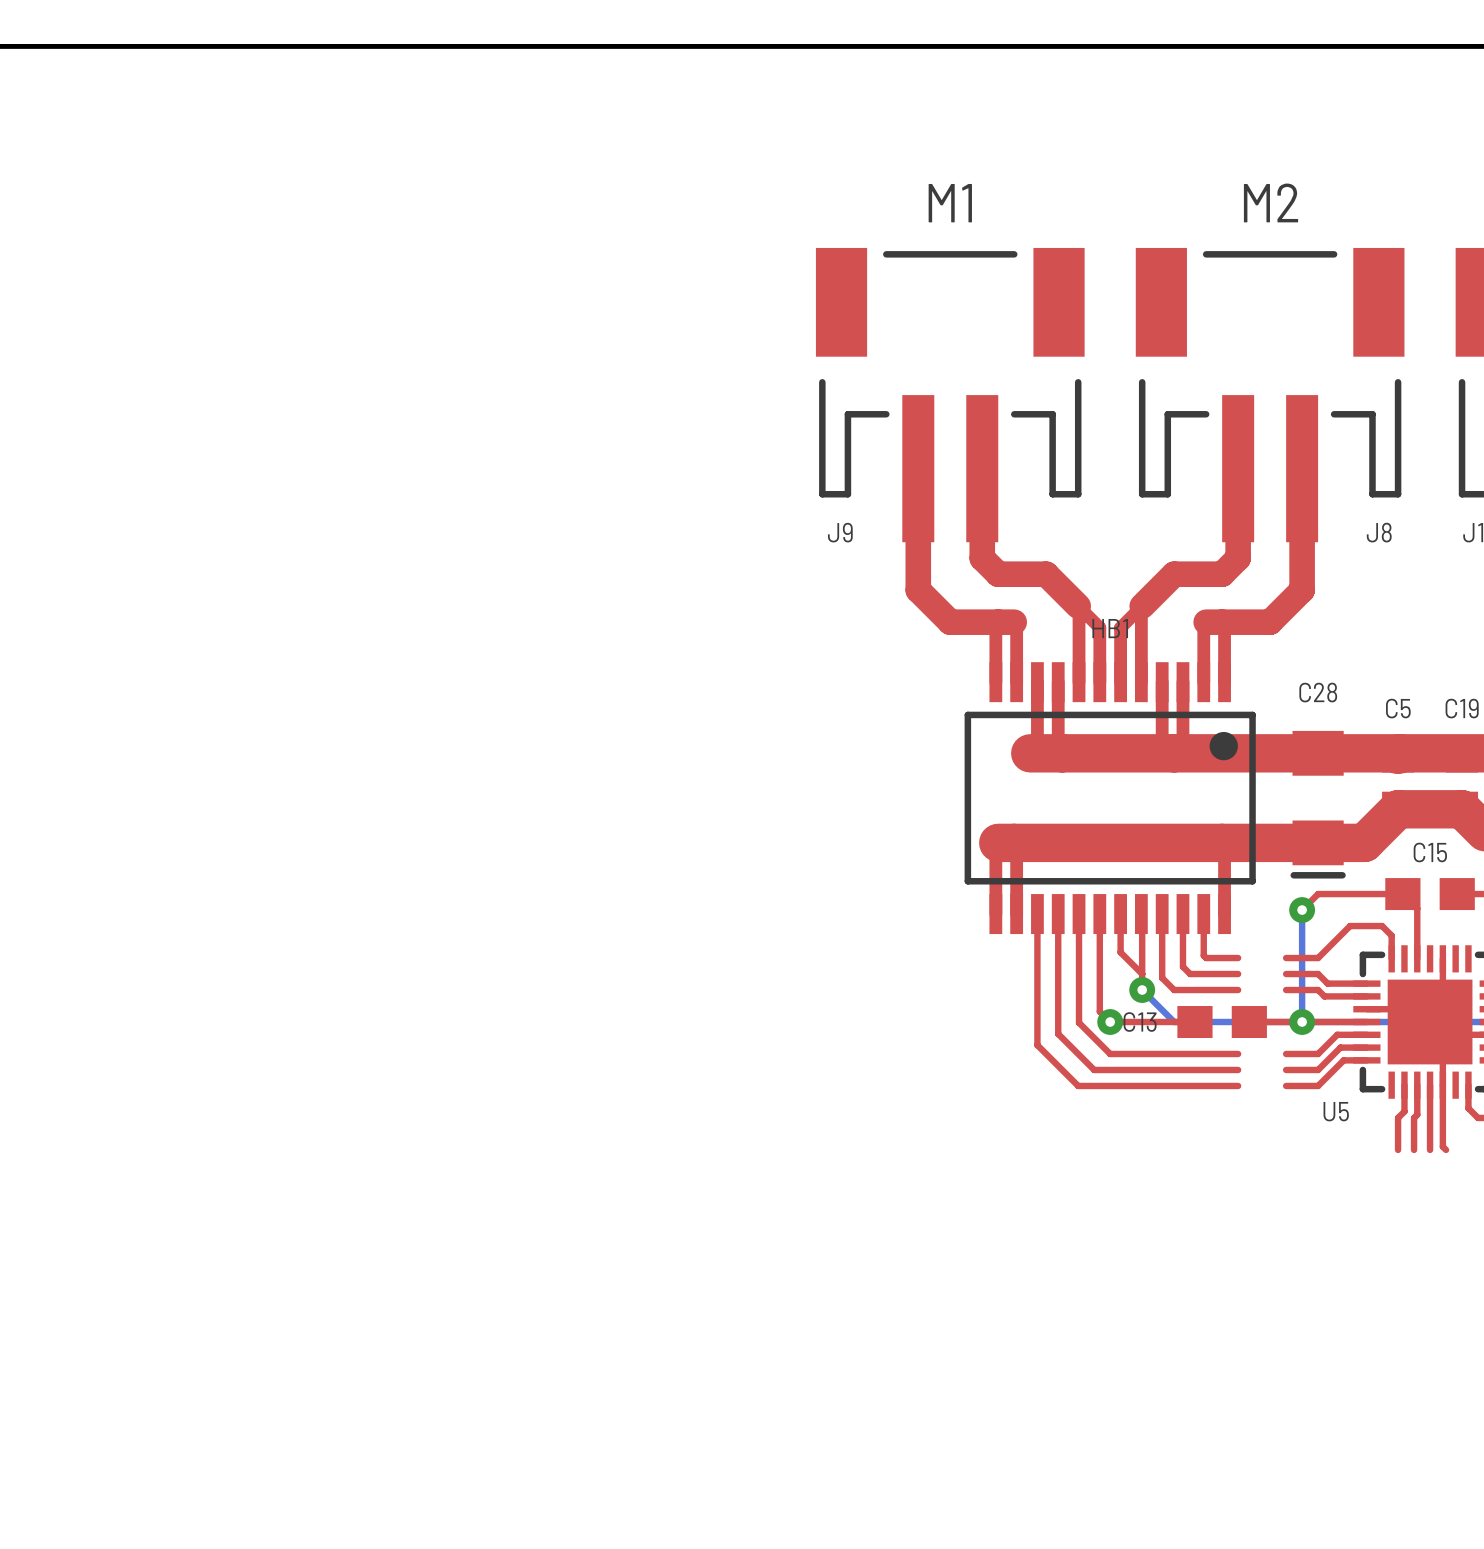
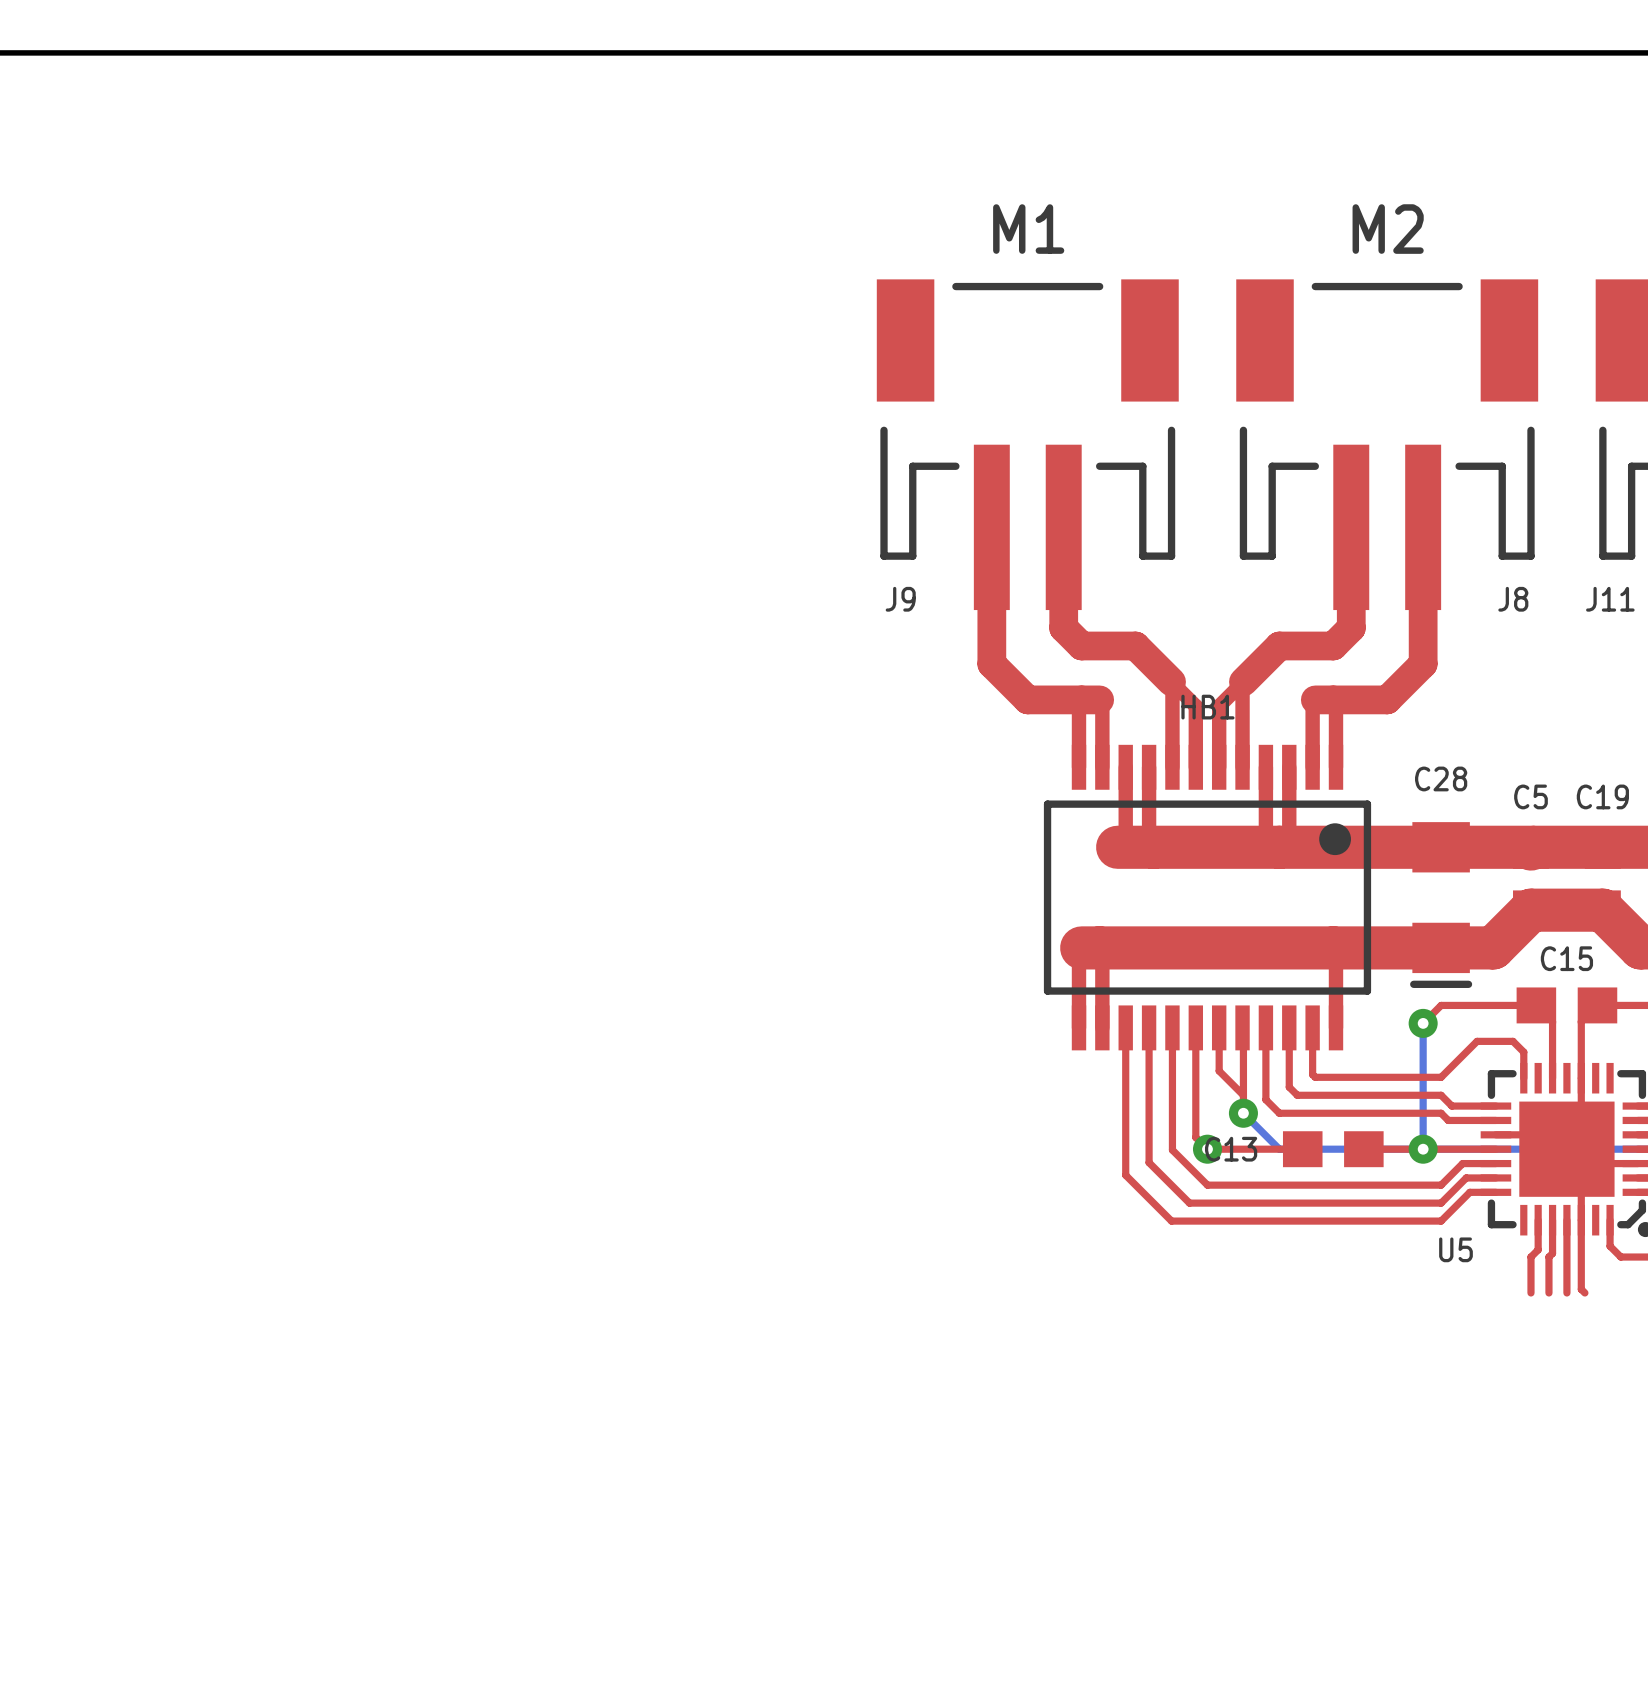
top track: none -> (1597, 1005) (1581, 1021) (1581, 1078)
top track: none -> (1351, 1077) (1405, 1077)
top track: none -> (1351, 1095) (1405, 1095)
top track: none -> (1351, 1113) (1405, 1113)
top track: none -> (1351, 1185) (1405, 1185)
top track: none -> (1351, 1203) (1405, 1203)
top track: none -> (1351, 1221) (1405, 1221)

